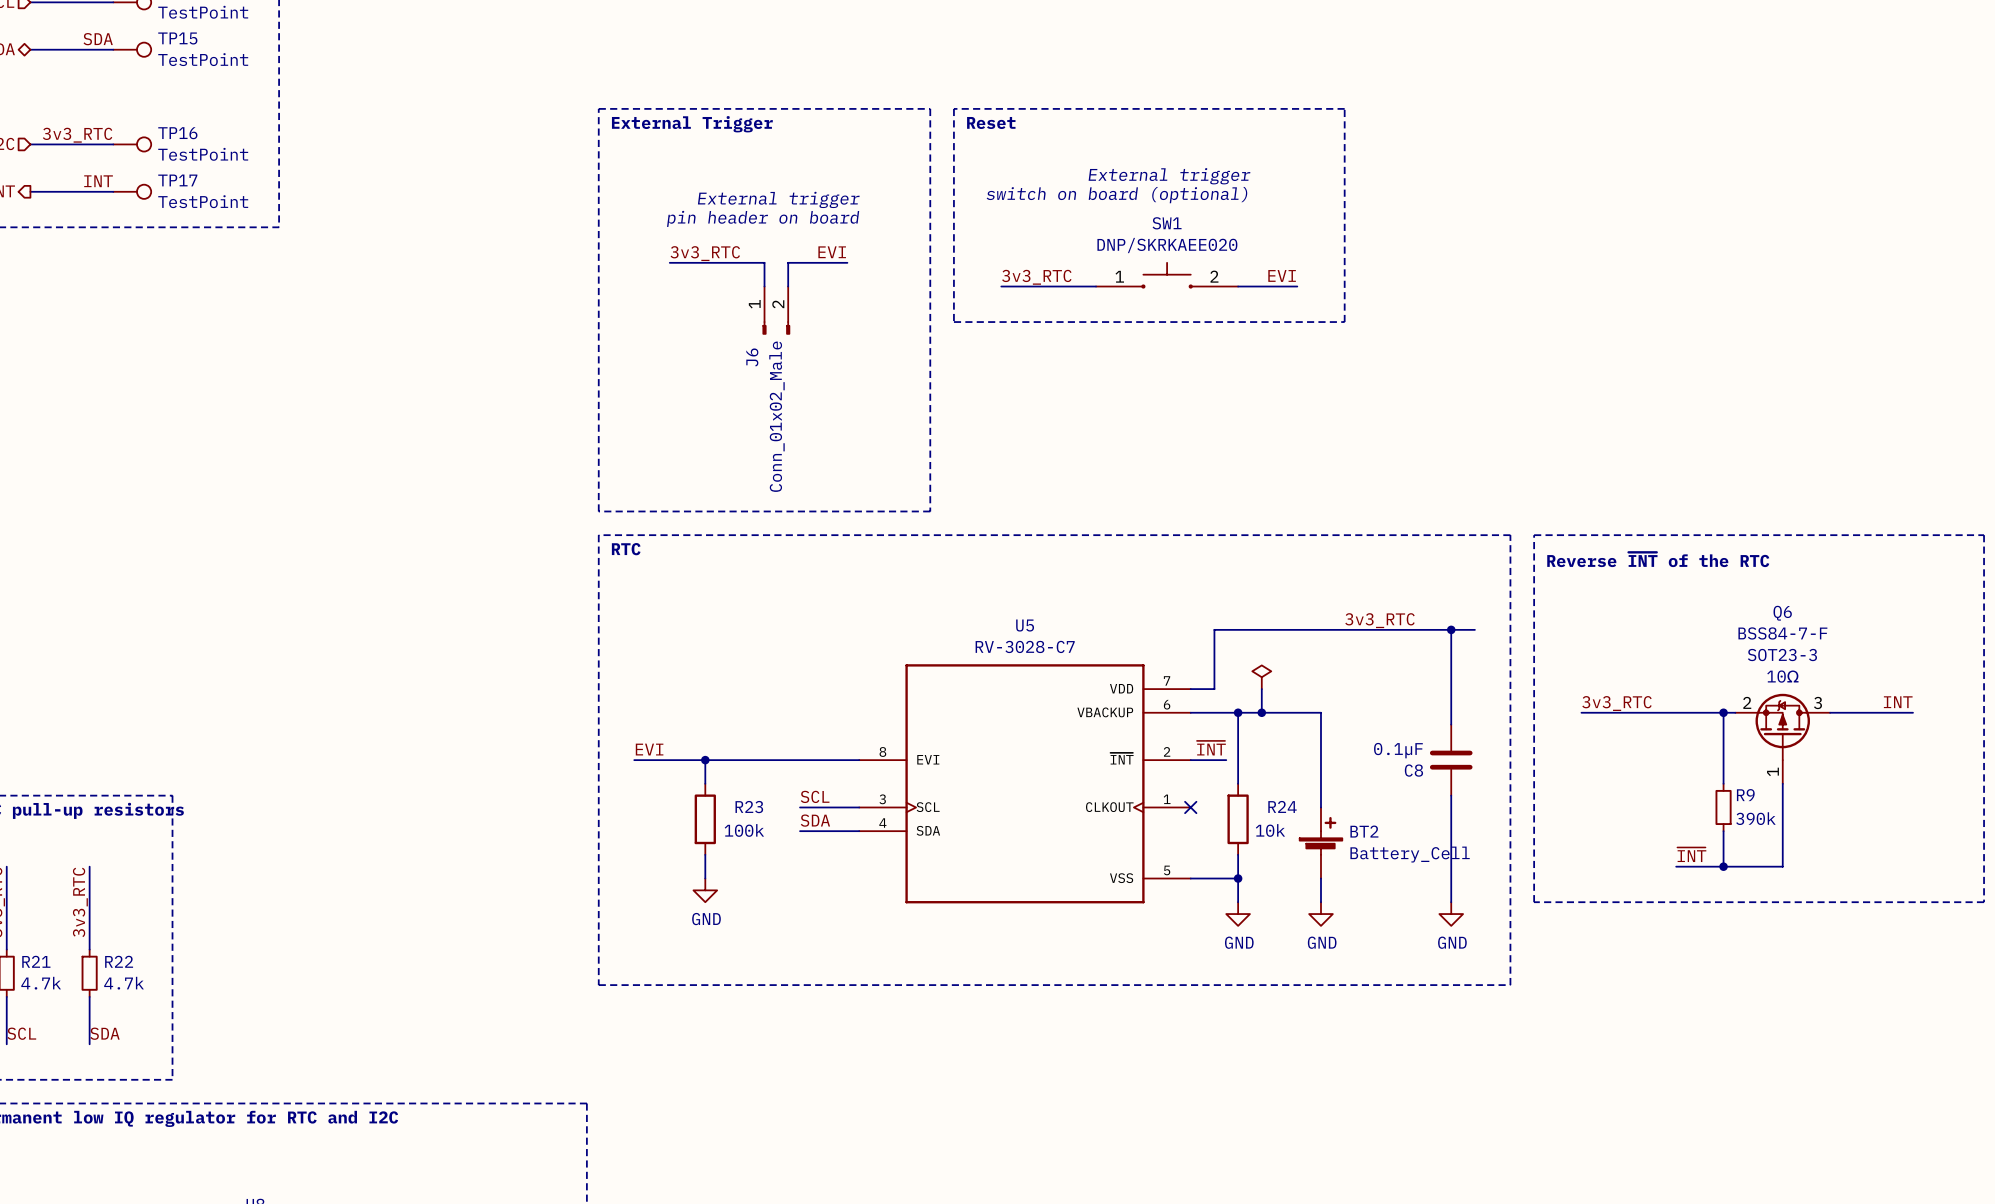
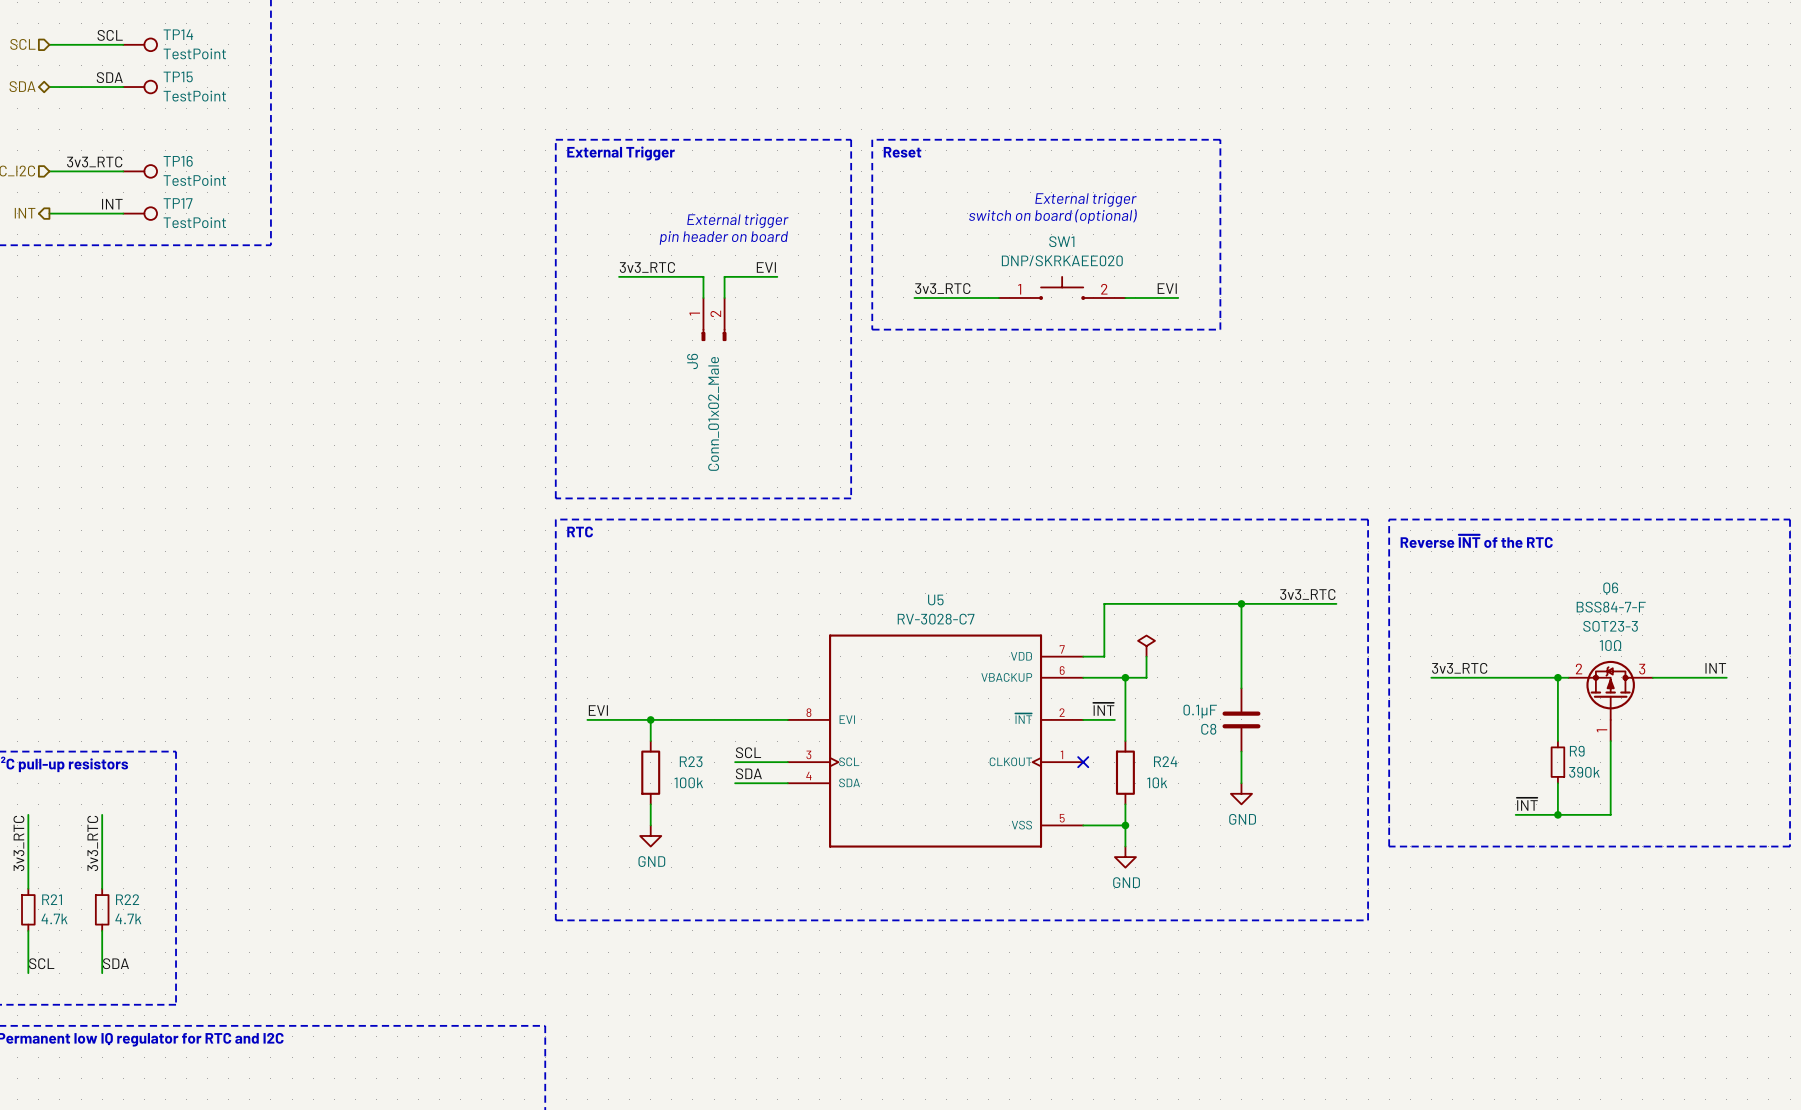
label position: 3v3_RTC (1379, 620) -> 3v3_RTC (1307, 594)
junction: none -> (1241, 603)
wire: (1451, 629) (1451, 724) -> (1241, 603) (1241, 688)
junction: (1451, 629) -> none
wire: (1261, 712) (1320, 712) (1320, 807) -> none
junction: (1261, 712) -> none
C8 position: (1451, 760) -> (1241, 719)
wire: none -> (1241, 751) (1241, 783)
wire: (1451, 795) (1451, 902) -> none
BT2: Battery_Cell (1320, 843) -> none
power symbol: none -> GND (1241, 793)
wire: (1320, 878) (1320, 902) -> none
power symbol: GND (1320, 914) -> none
power symbol: GND (1451, 914) -> none

